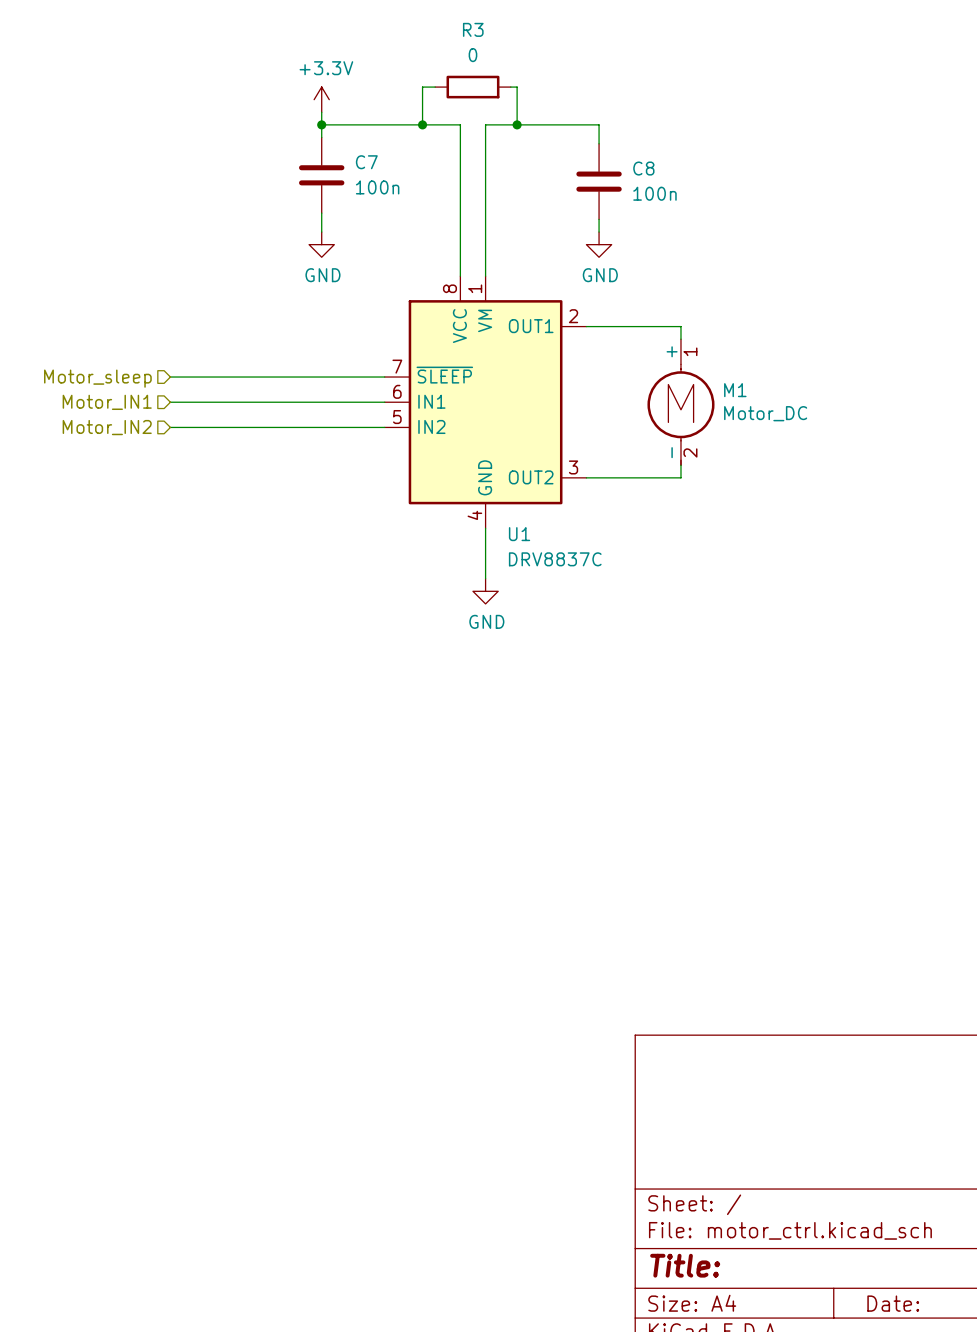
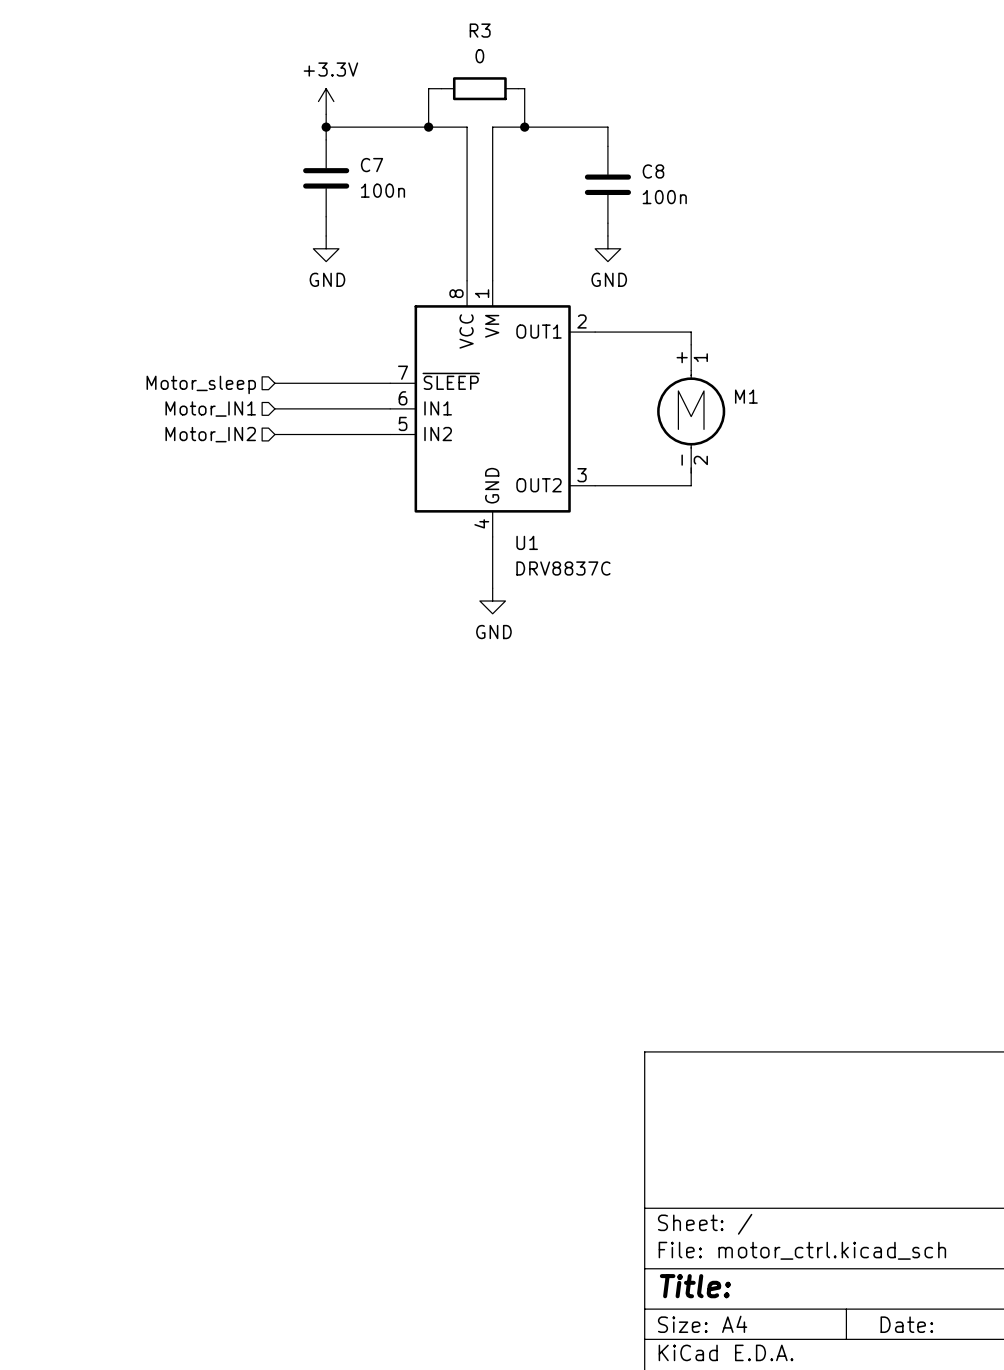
wire: (170, 377) (271, 377) -> none
hierarchical label position: Motor_sleep (97, 378) -> Motor_sleep (201, 384)
hierarchical label position: Motor_IN1 (107, 402) -> Motor_IN1 (210, 409)
wire: (170, 402) (271, 402) -> none
M1 value: Motor_DC (765, 413) -> none
hierarchical label position: Motor_IN2 (107, 427) -> Motor_IN2 (210, 434)
wire: (170, 427) (271, 427) -> none

